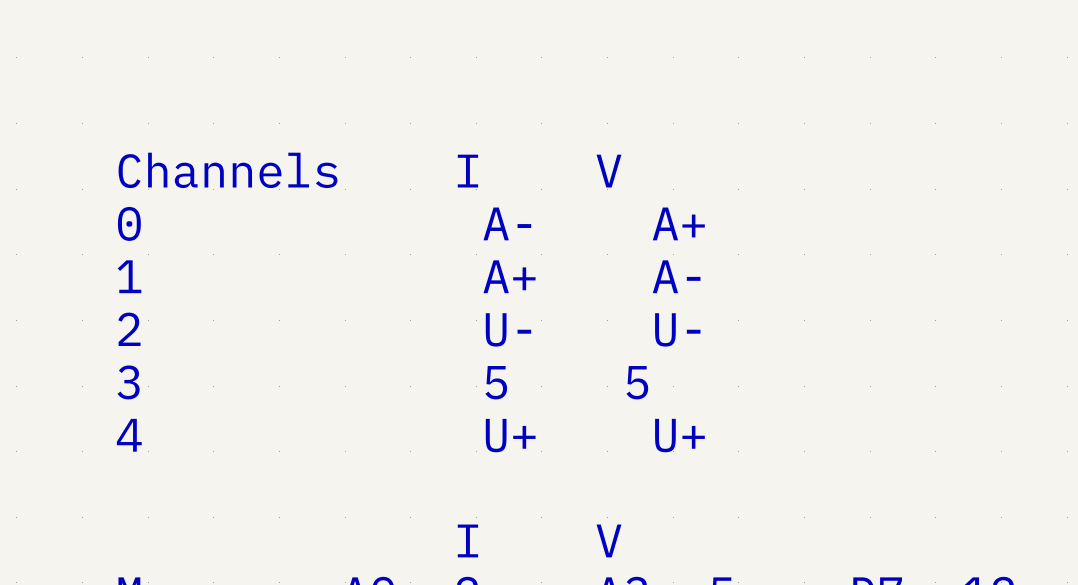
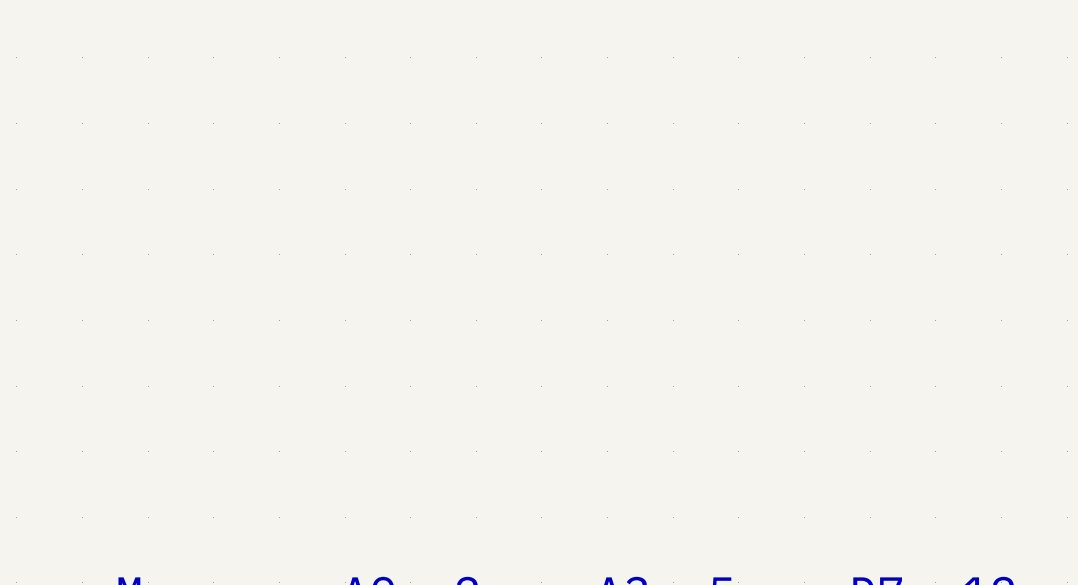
text: Channels I V (370, 170) -> none
text: 0 A- A+ (411, 223) -> none
text: 1 A+ A- (409, 276) -> none
text: 2 U- U- (409, 329) -> none
text: 3 5 5 (382, 382) -> none
text: 4 U+ U+ (410, 435) -> none
text: I V (539, 540) -> none

